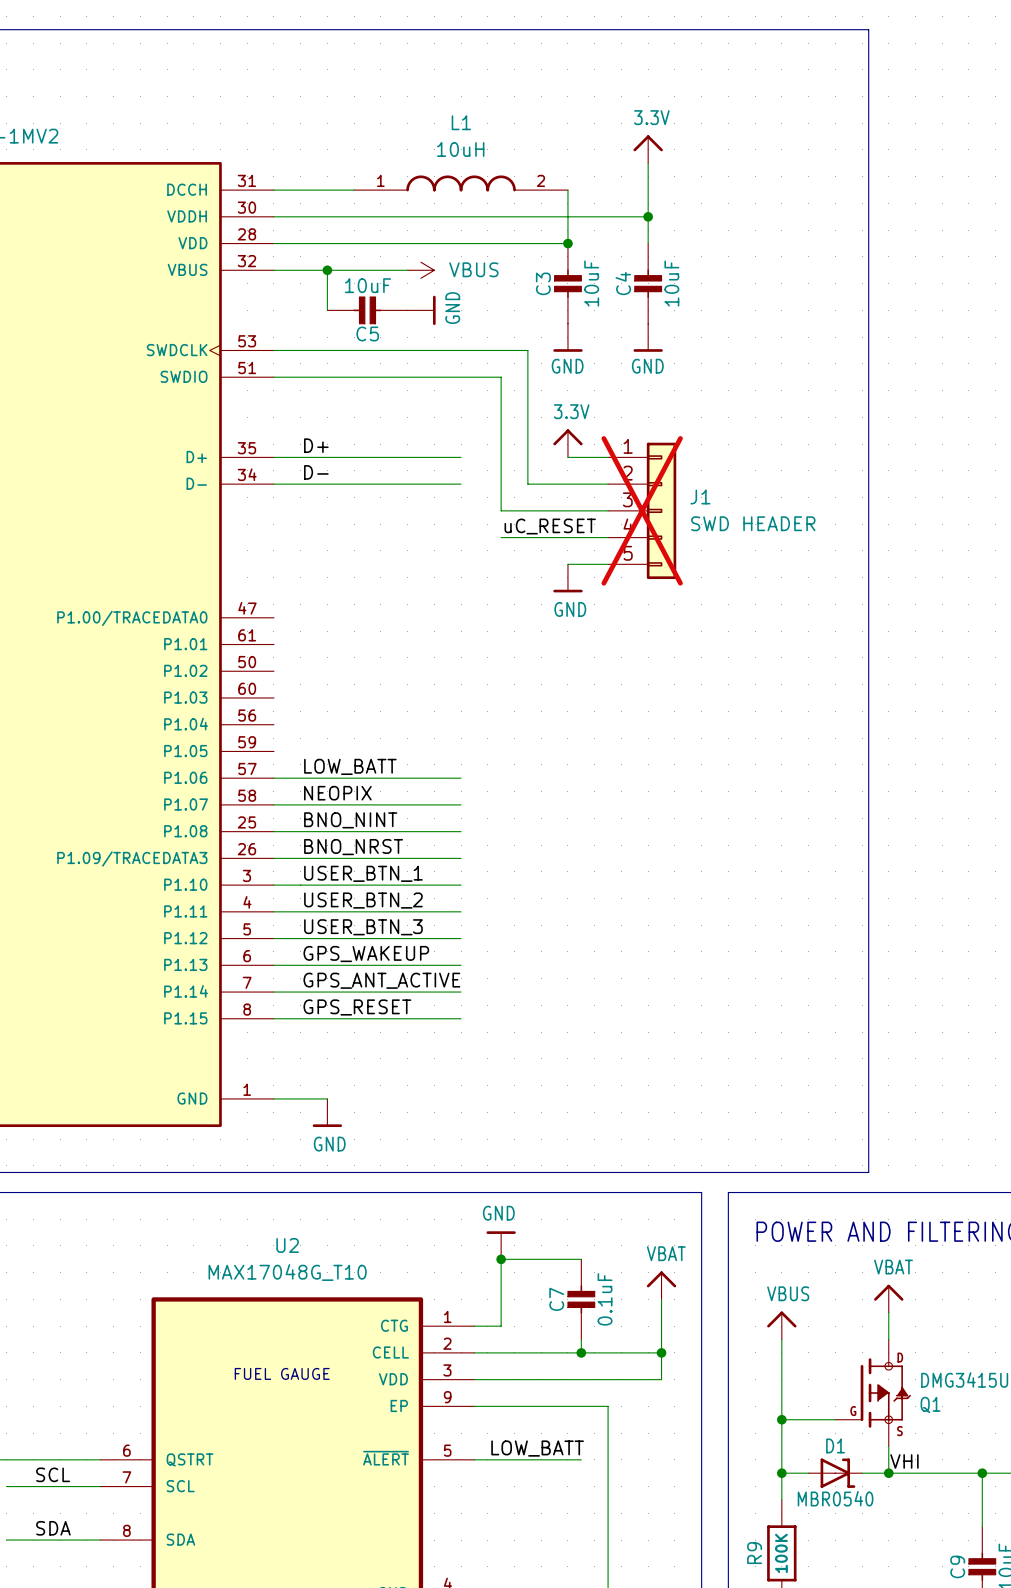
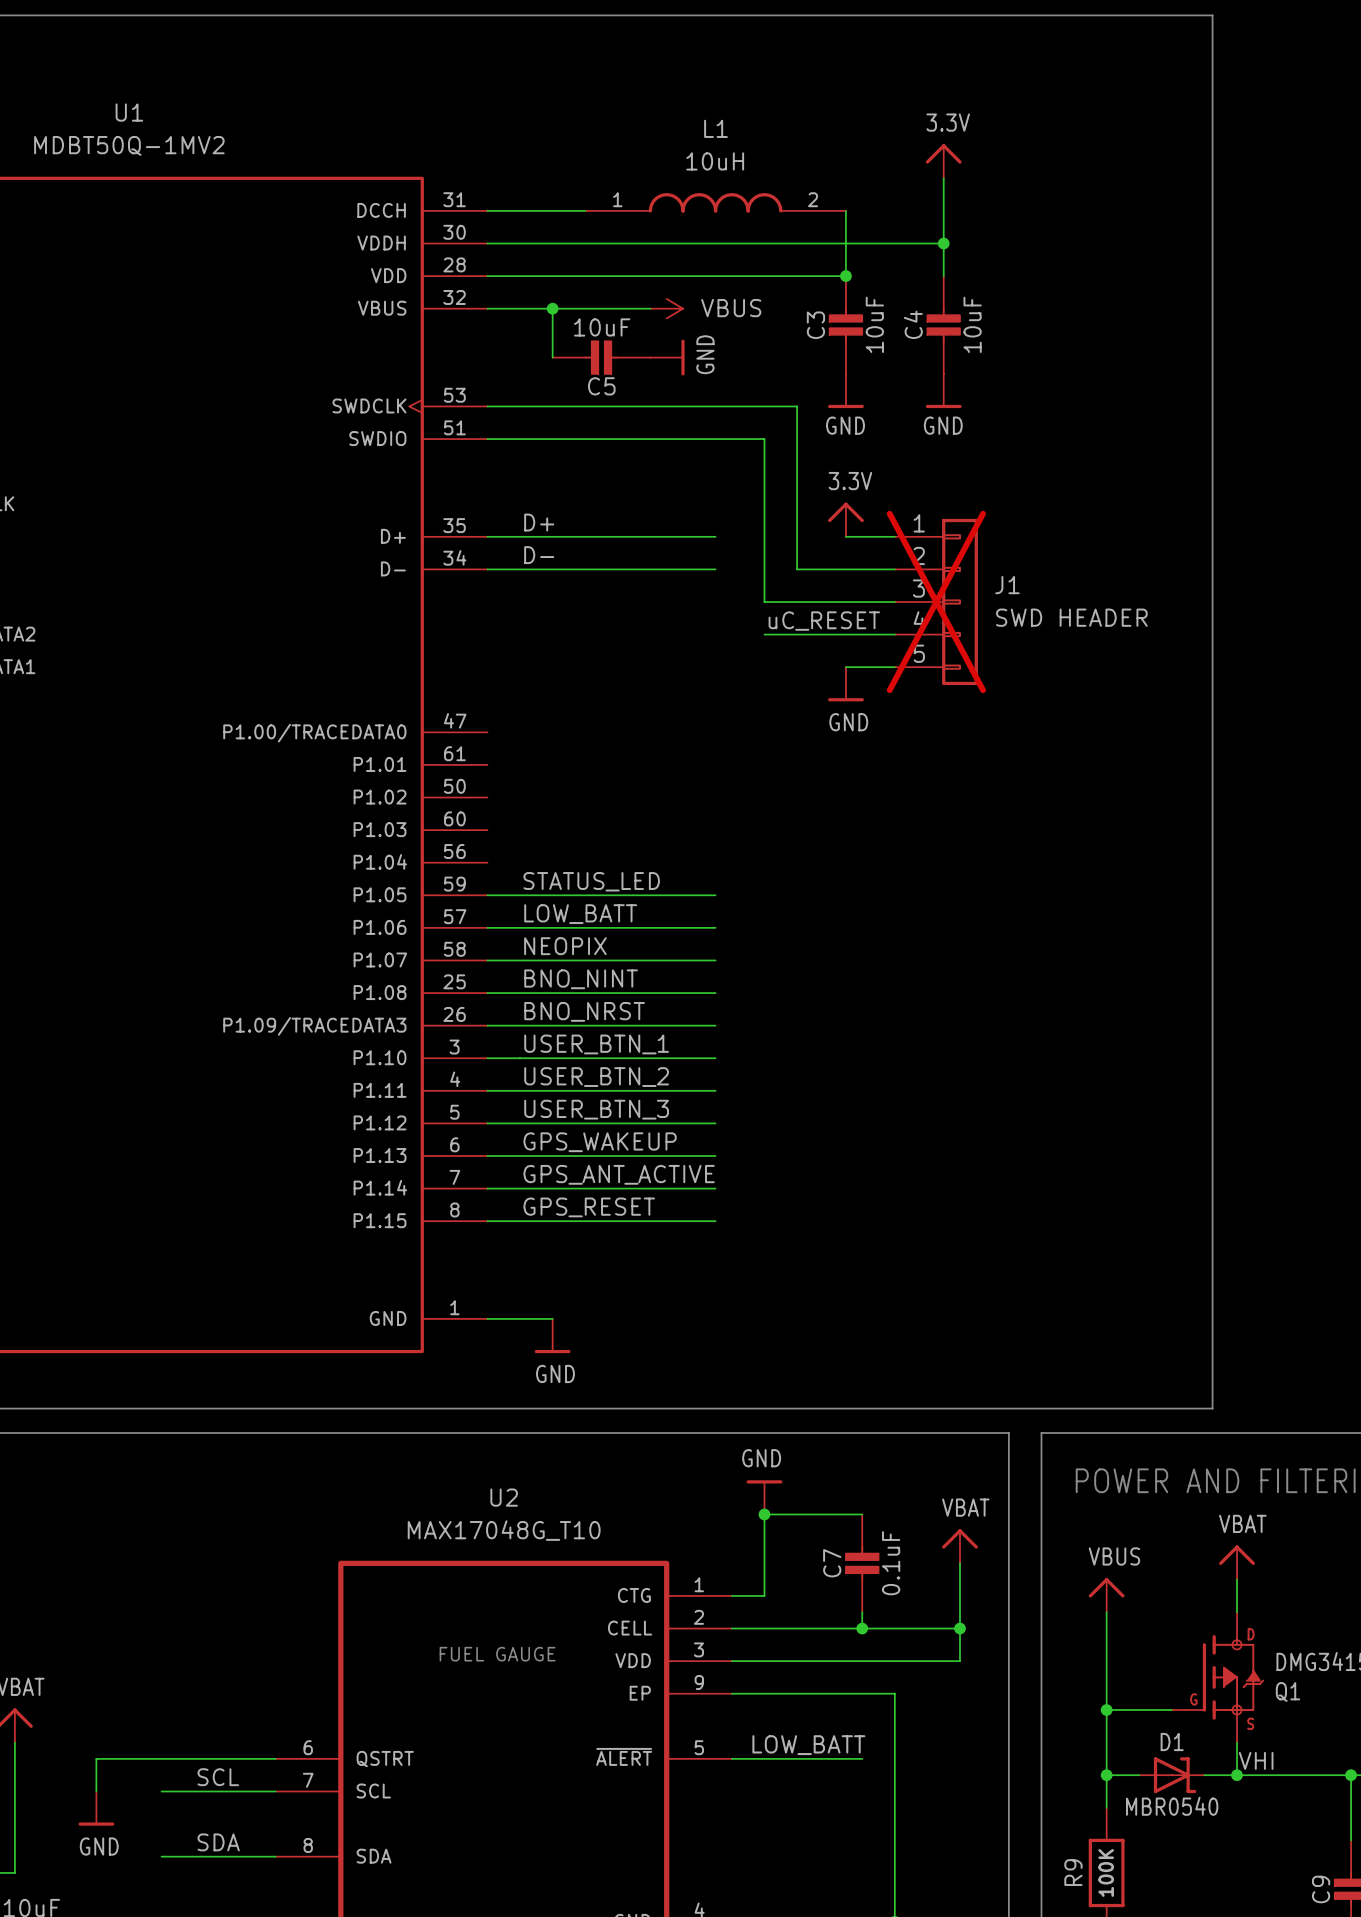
label: none -> STATUS_LED (591, 881)
wire: none -> (487, 895) (715, 895)

